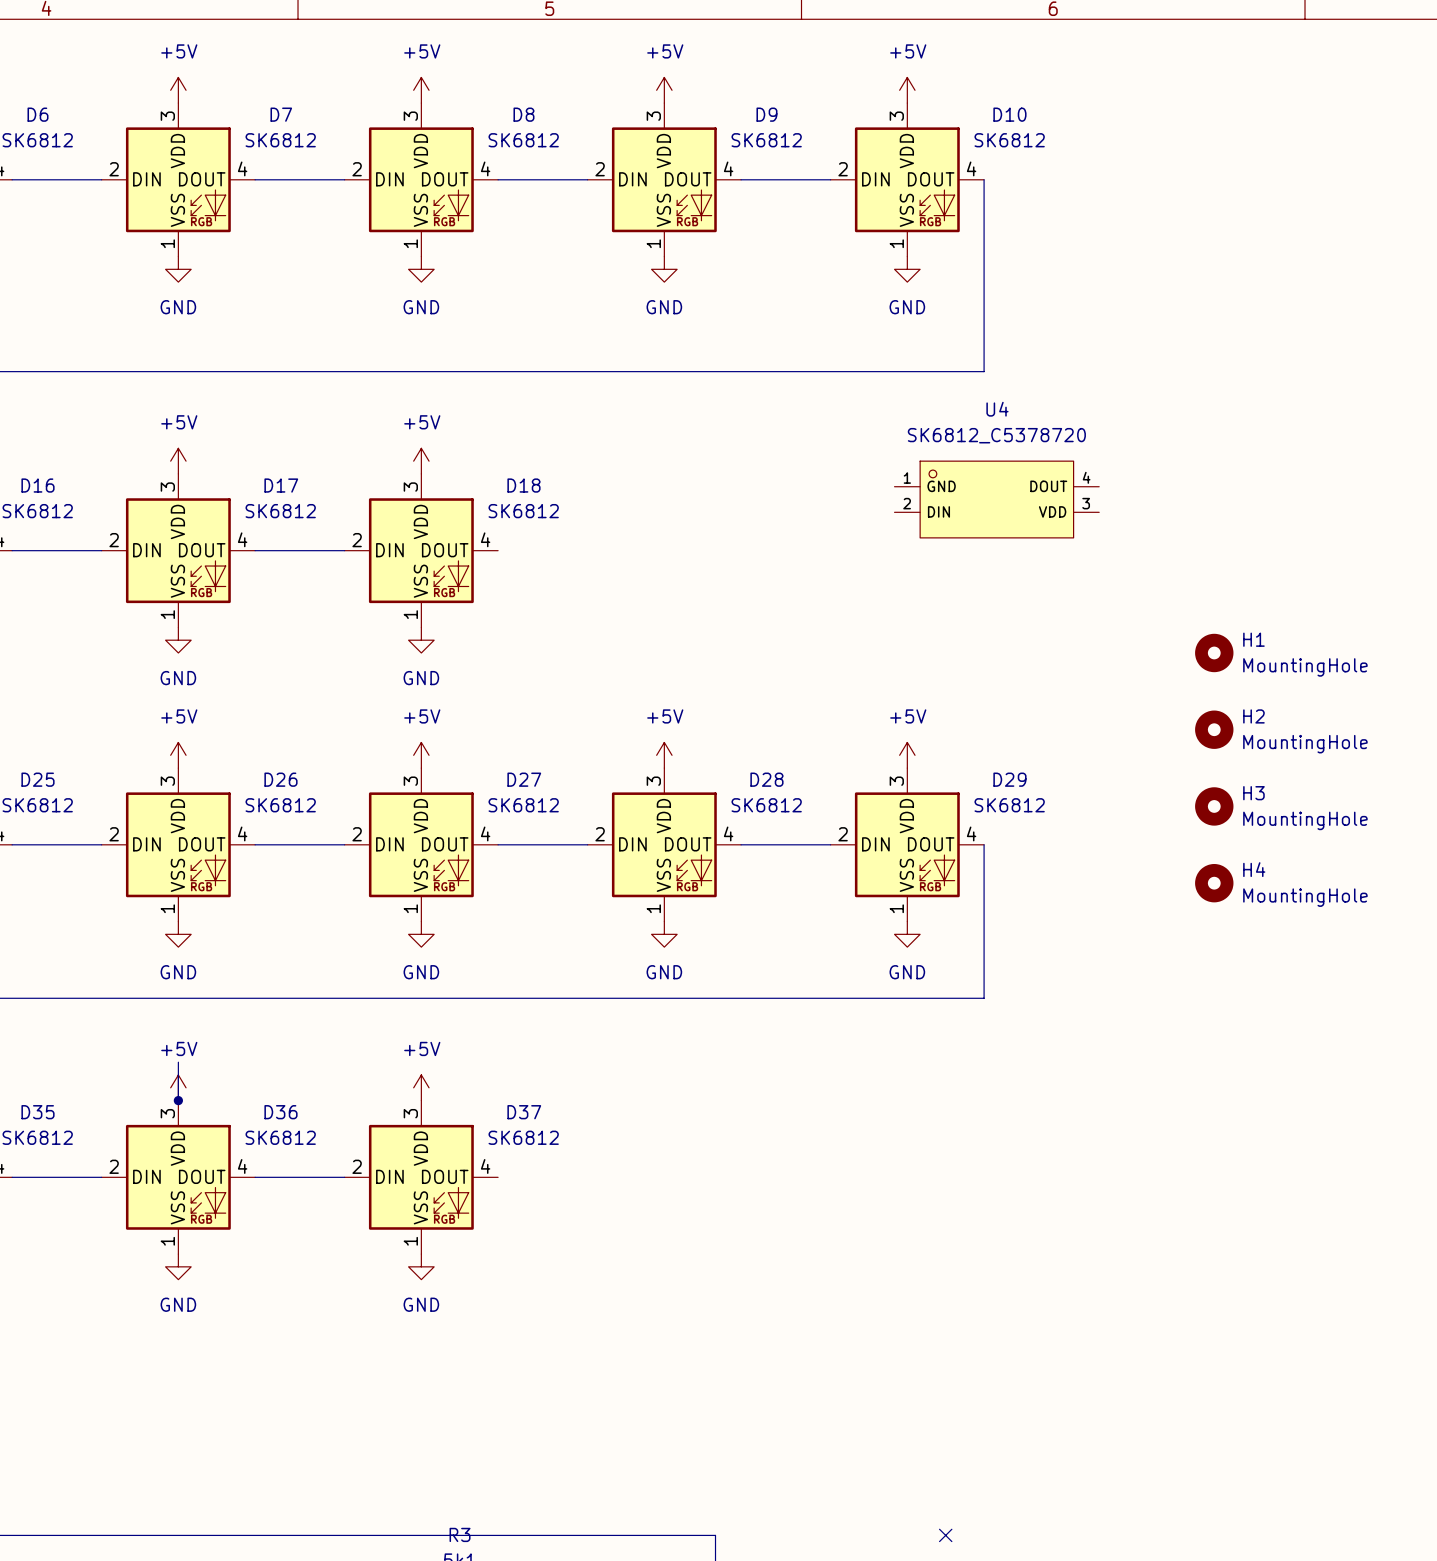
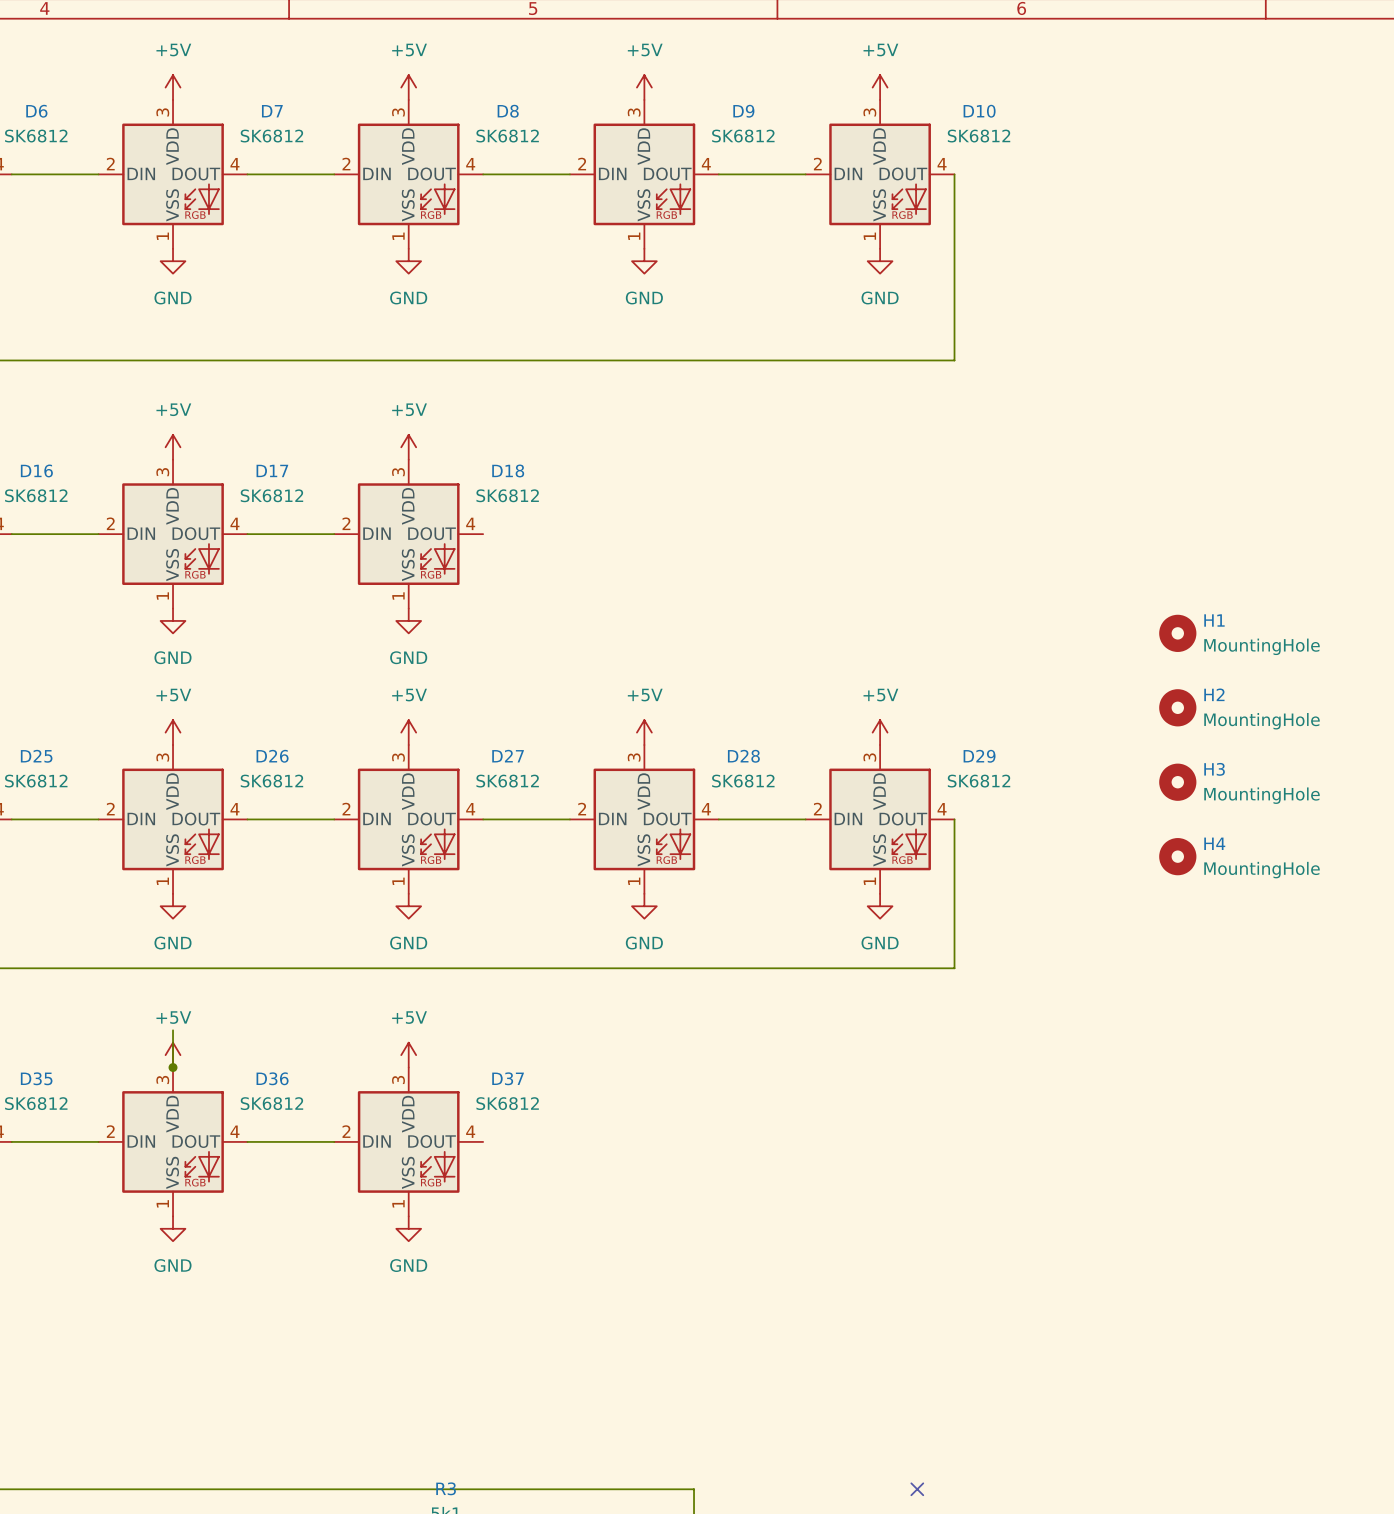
U4: SK6812_C5378720 (996, 499) -> none

